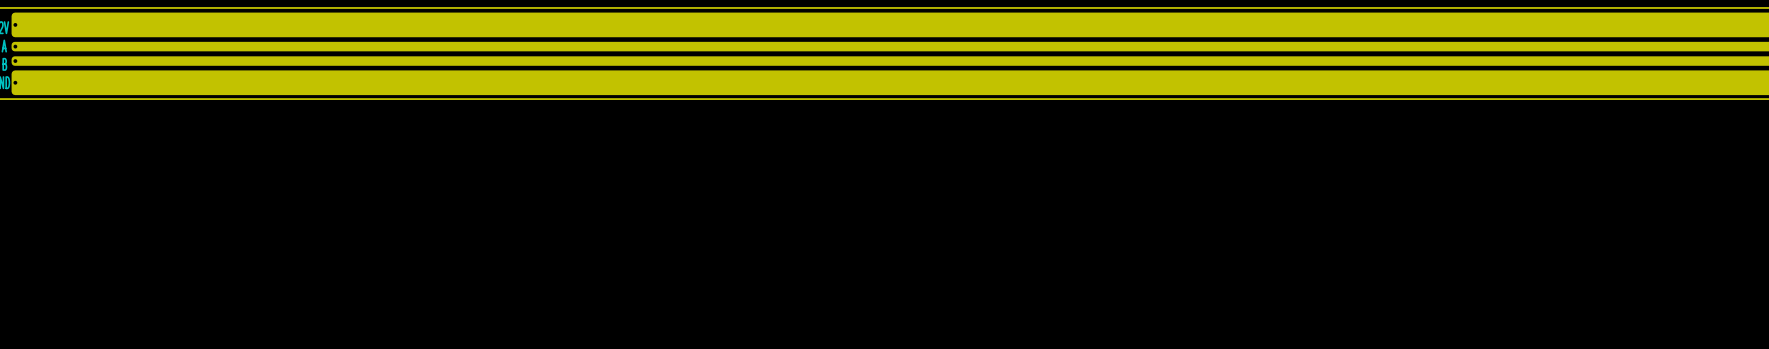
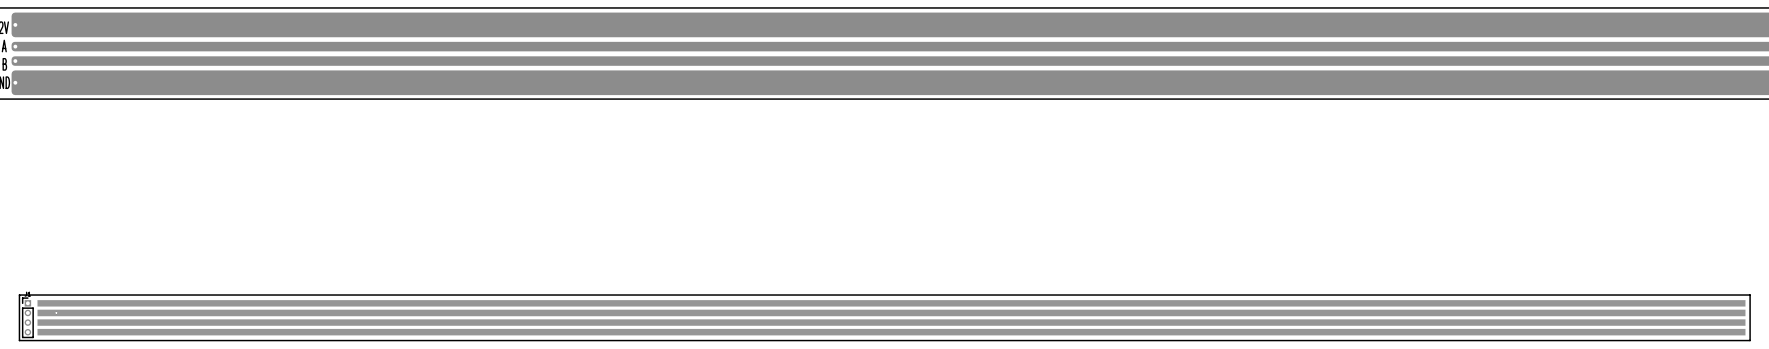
board edge: none -> (19, 295) (1750, 295) (1750, 340) (19, 340) (19, 295)
via: none -> (56, 312)
part: none -> (27, 317)
part: none -> (891, 317)

